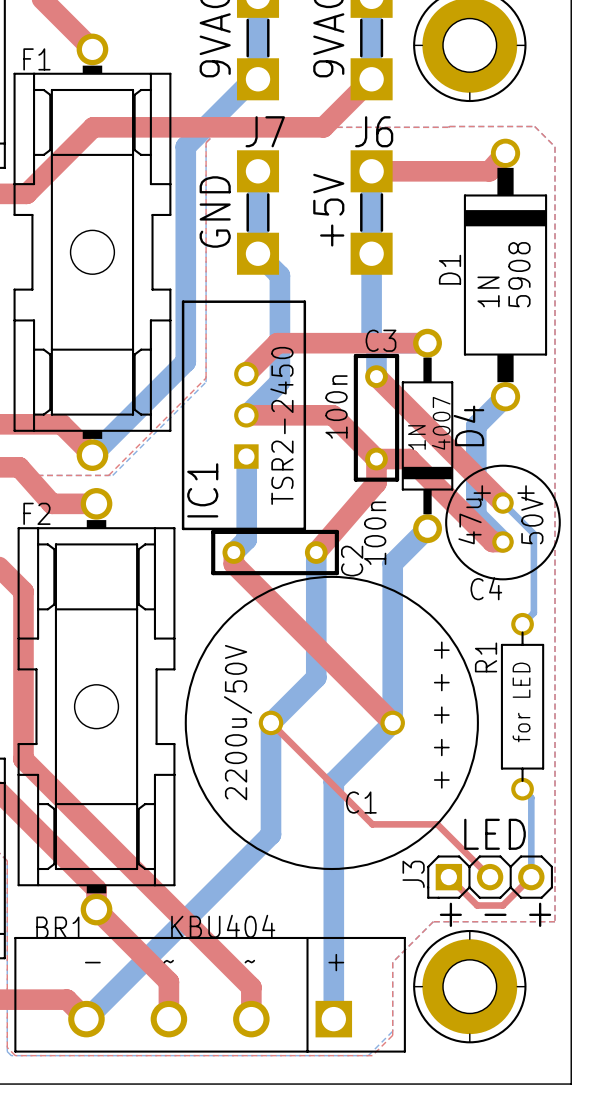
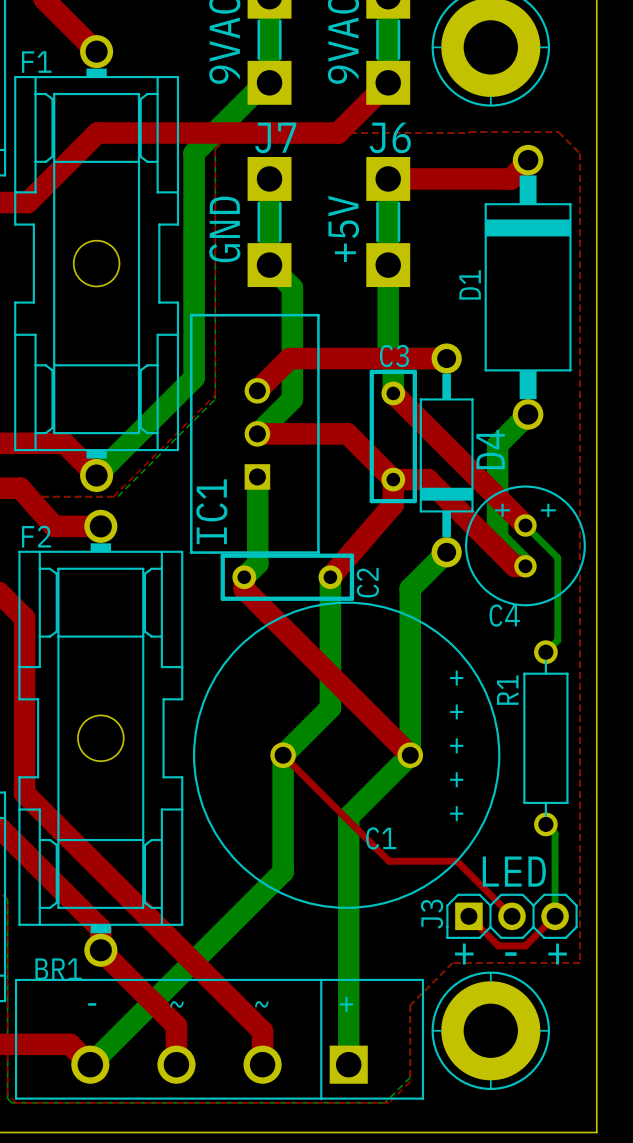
text: 5908 (519, 274) -> none
text: 1N (488, 291) -> none
text: 100n (336, 406) -> none
text: 4007 (441, 423) -> none
text: TSR2-2450 (281, 425) -> none
text: 1N (416, 437) -> none
text: 50V (532, 520) -> none
text: 47u (470, 521) -> none
text: 100n (375, 533) -> none
text: for LED (521, 702) -> none
text: 2200u/50V (238, 722) -> none
text: KBU404 (223, 926) -> none

